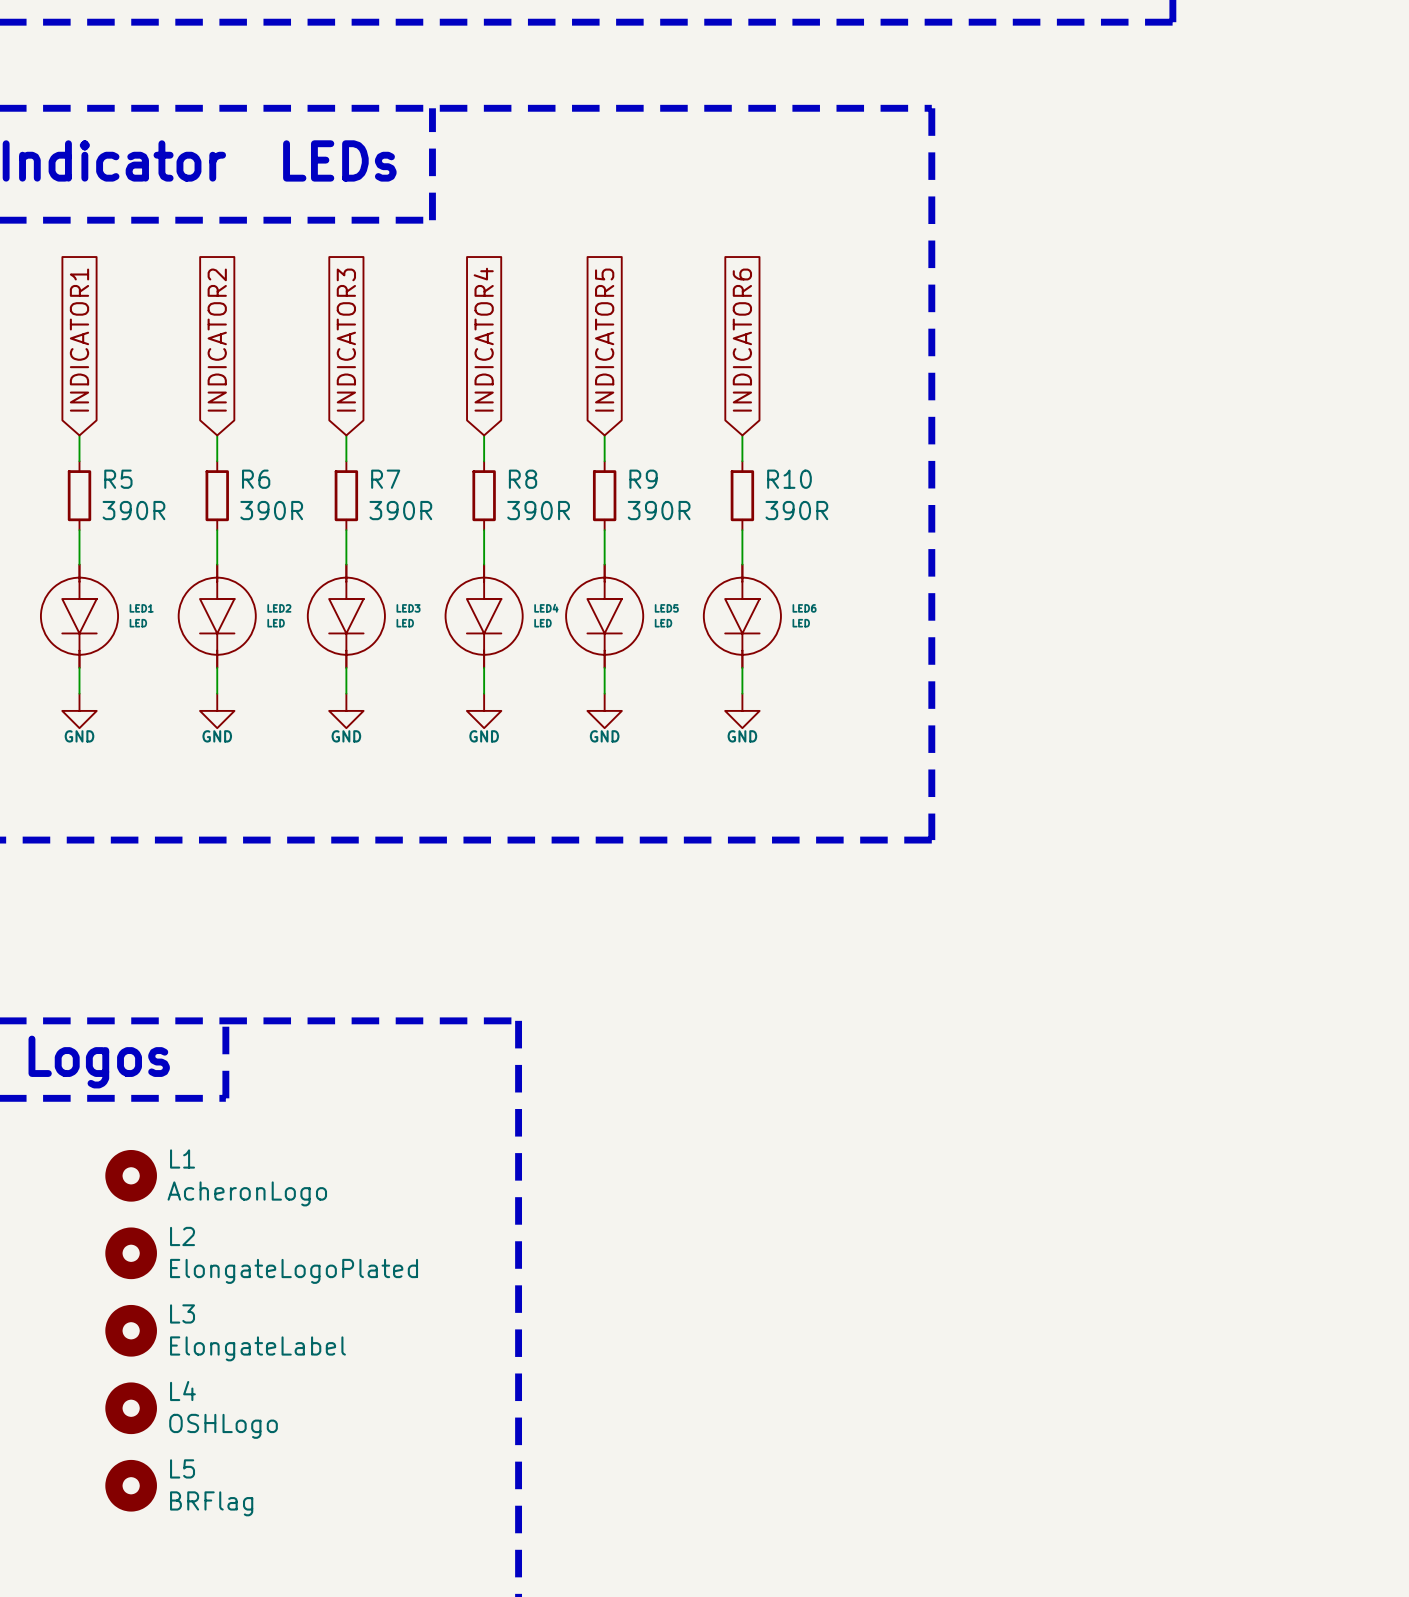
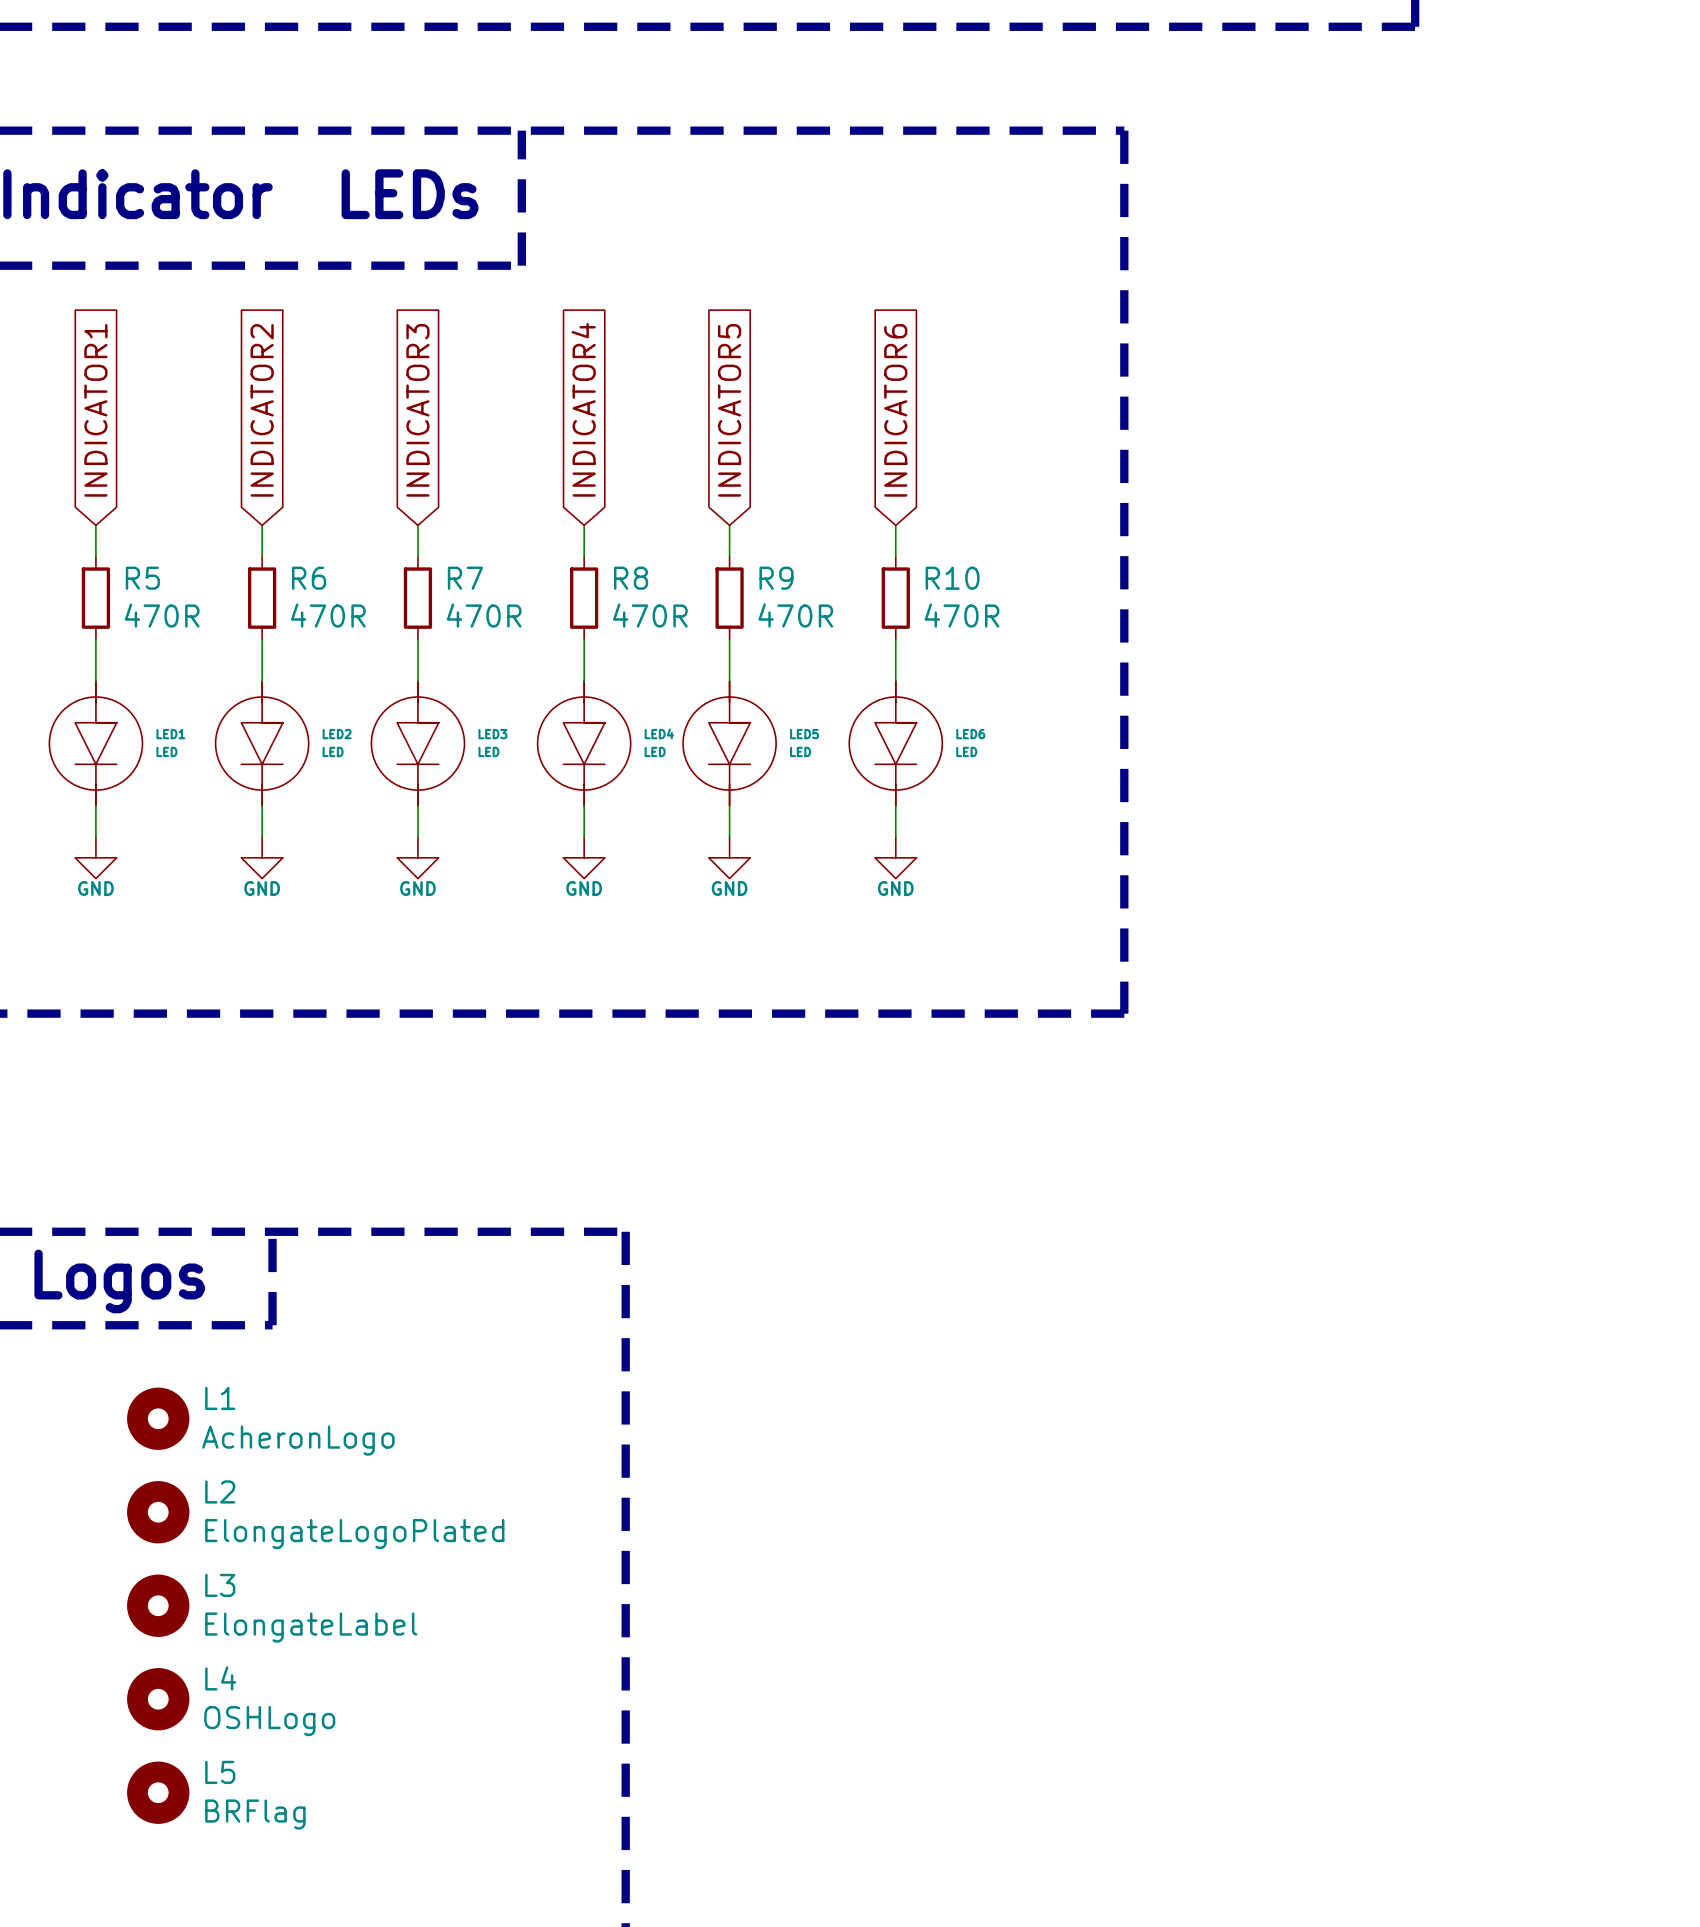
R5 value: 390R (133, 510) -> 470R (162, 615)
R6 value: 390R (271, 510) -> 470R (328, 615)
R7 value: 390R (400, 510) -> 470R (484, 615)
R8 value: 390R (538, 510) -> 470R (650, 615)
R9 value: 390R (659, 510) -> 470R (795, 615)
R10 value: 390R (796, 510) -> 470R (962, 615)

